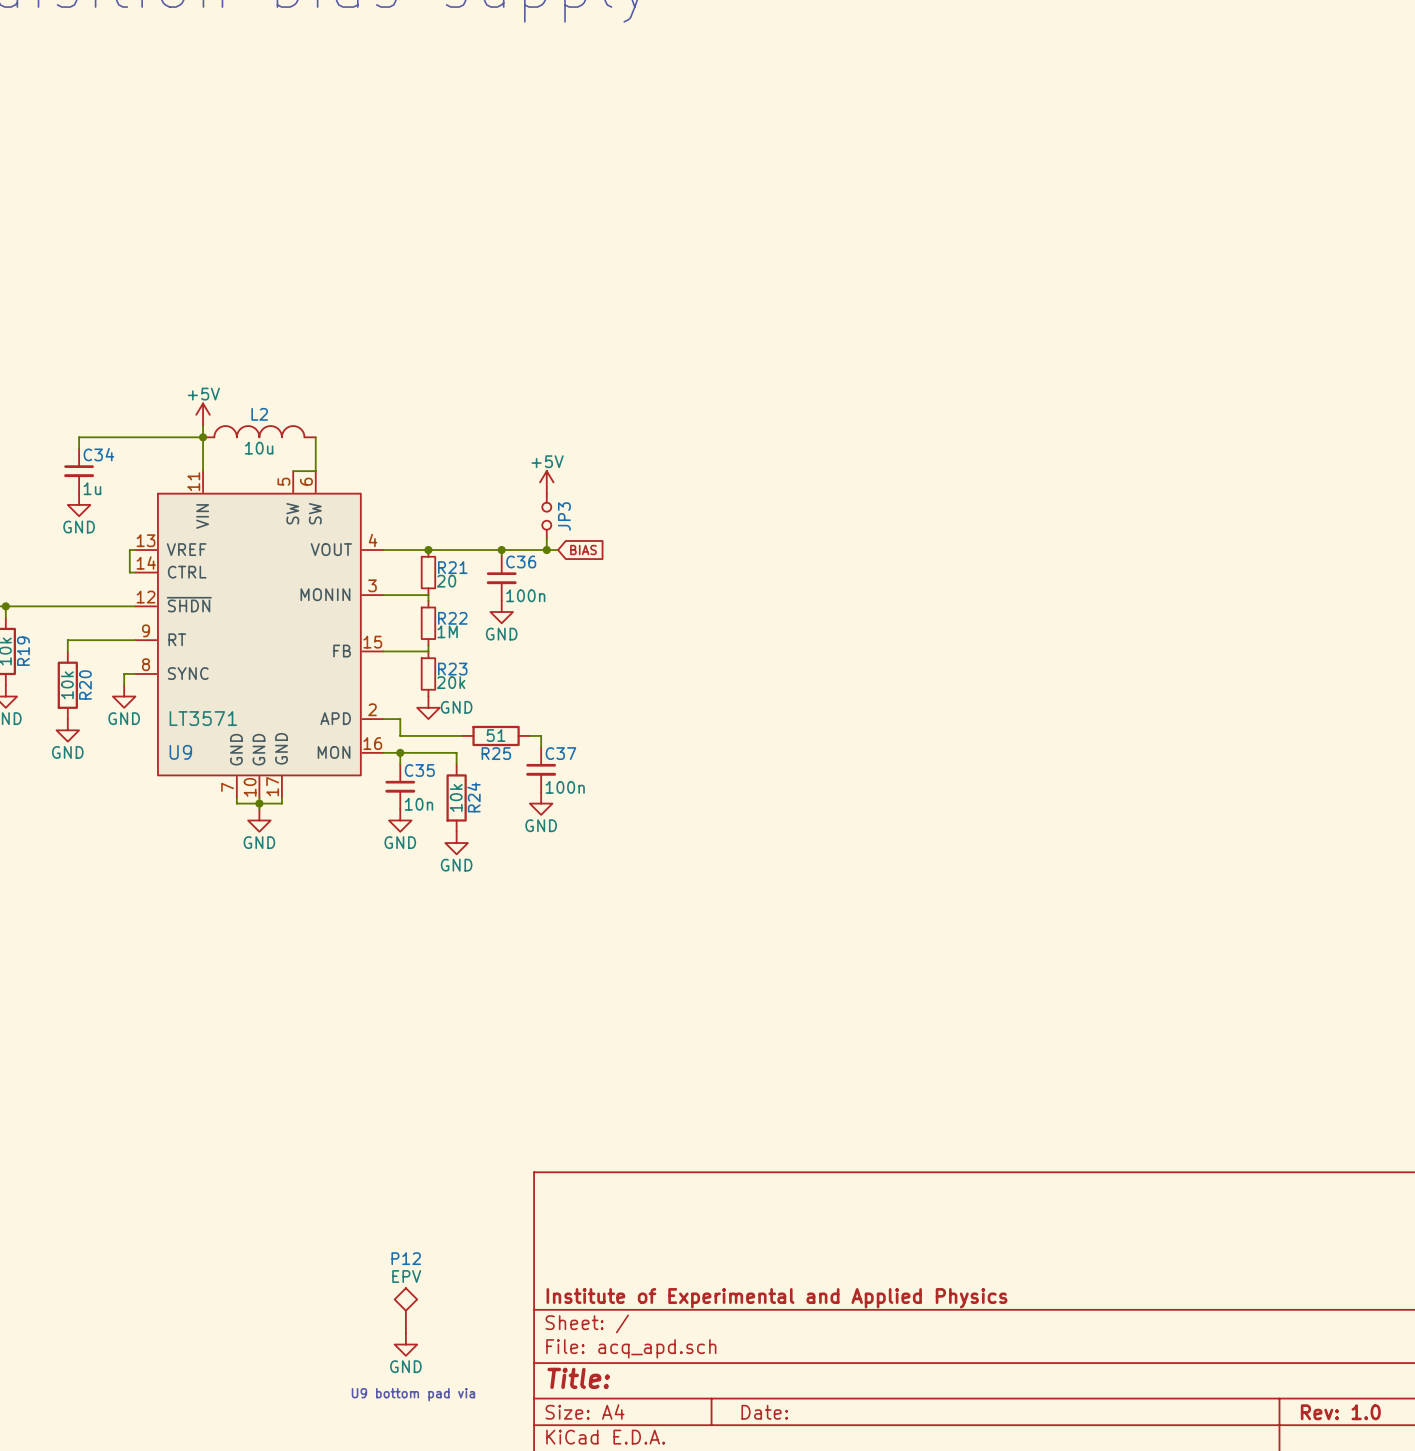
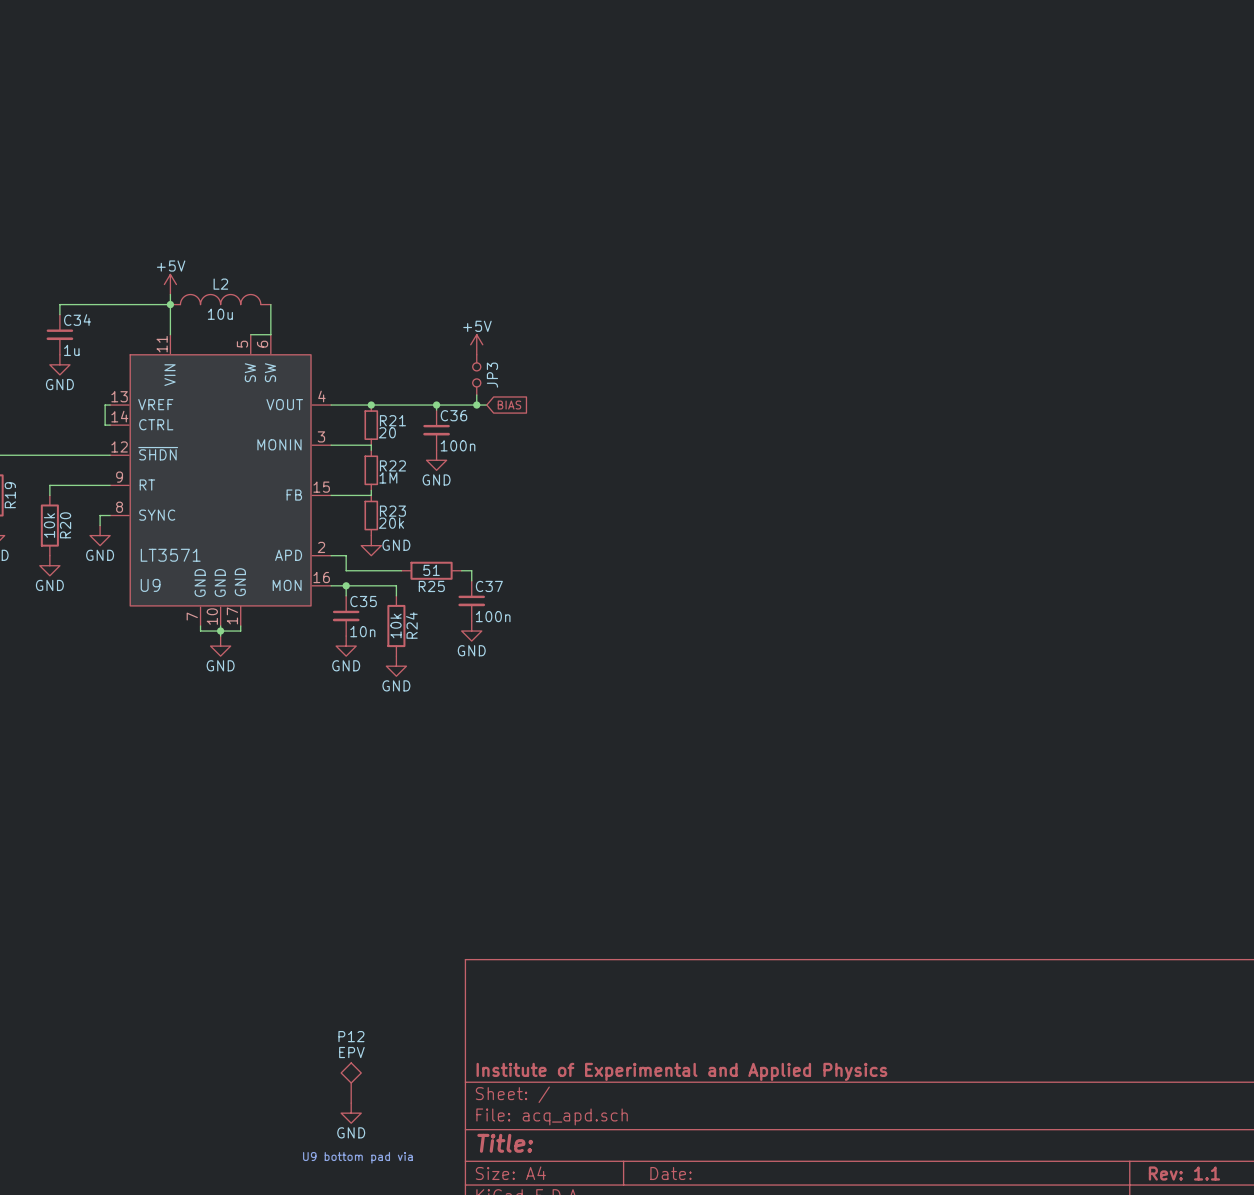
title block: Rev: 1.0 (1340, 1412) -> Rev: 1.1 (1184, 1173)

